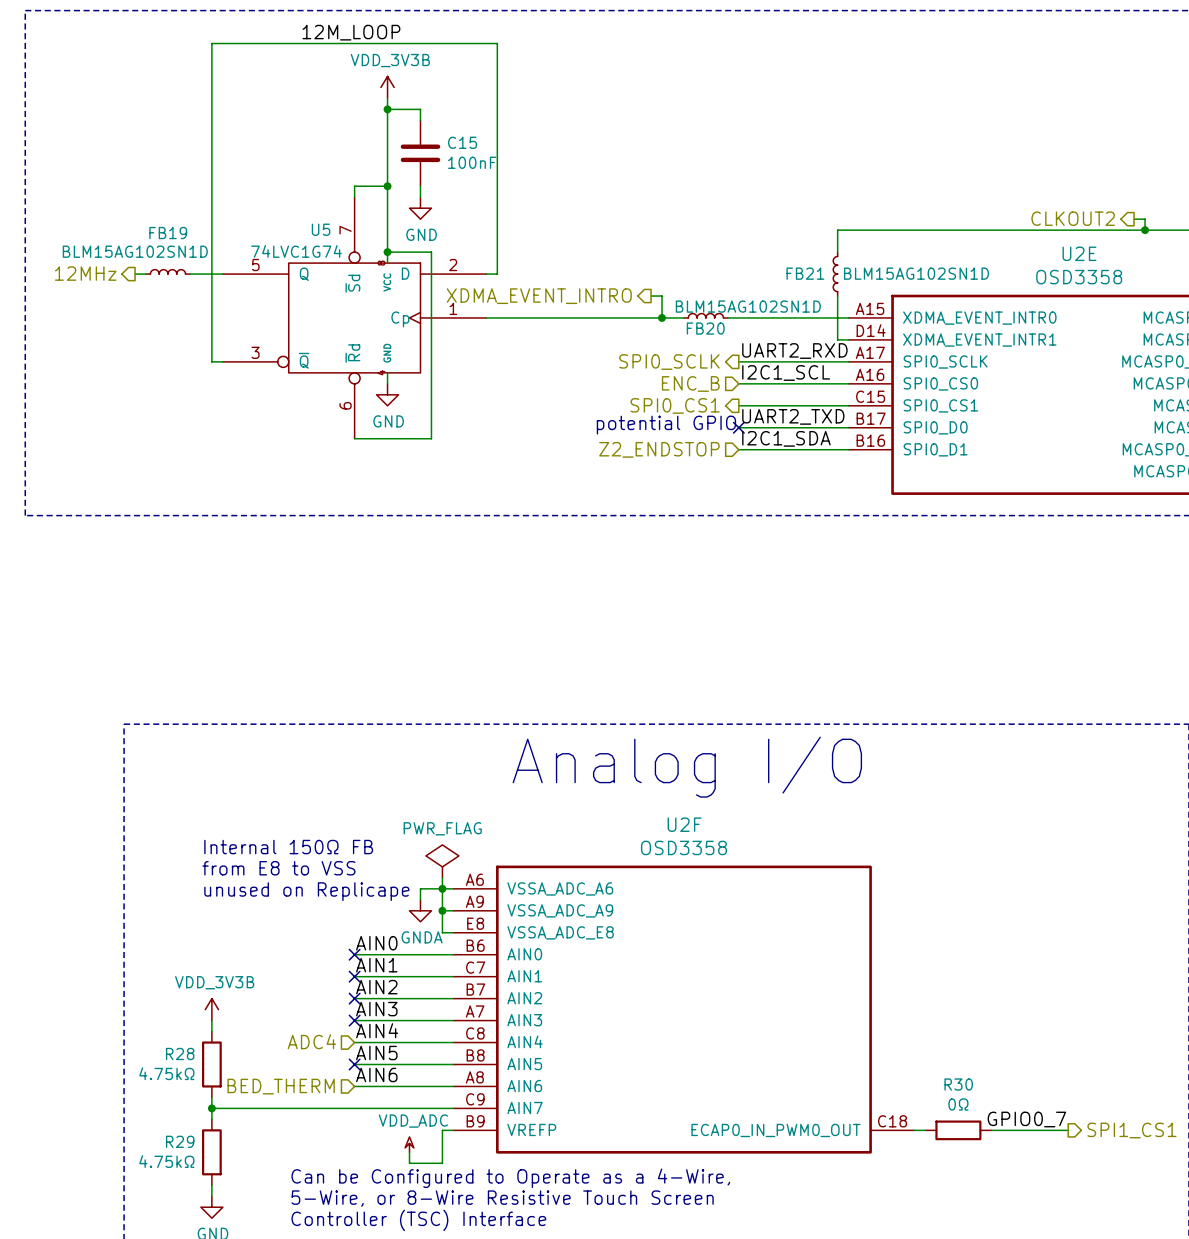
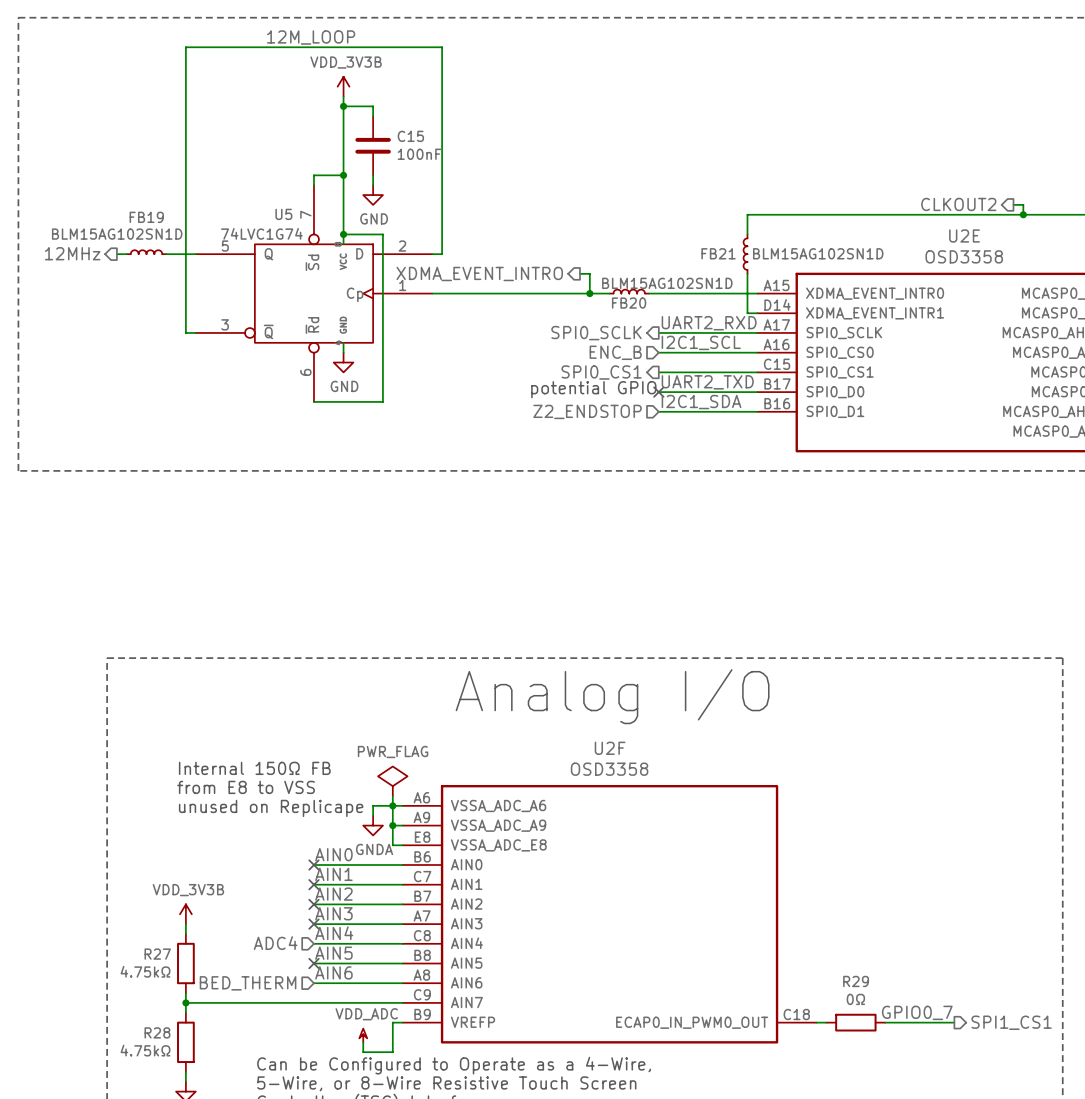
R28 name: R28 (180, 1053) -> R27 (157, 954)
R30 name: R30 (958, 1084) -> R29 (856, 981)
R29 name: R29 (180, 1141) -> R28 (157, 1032)

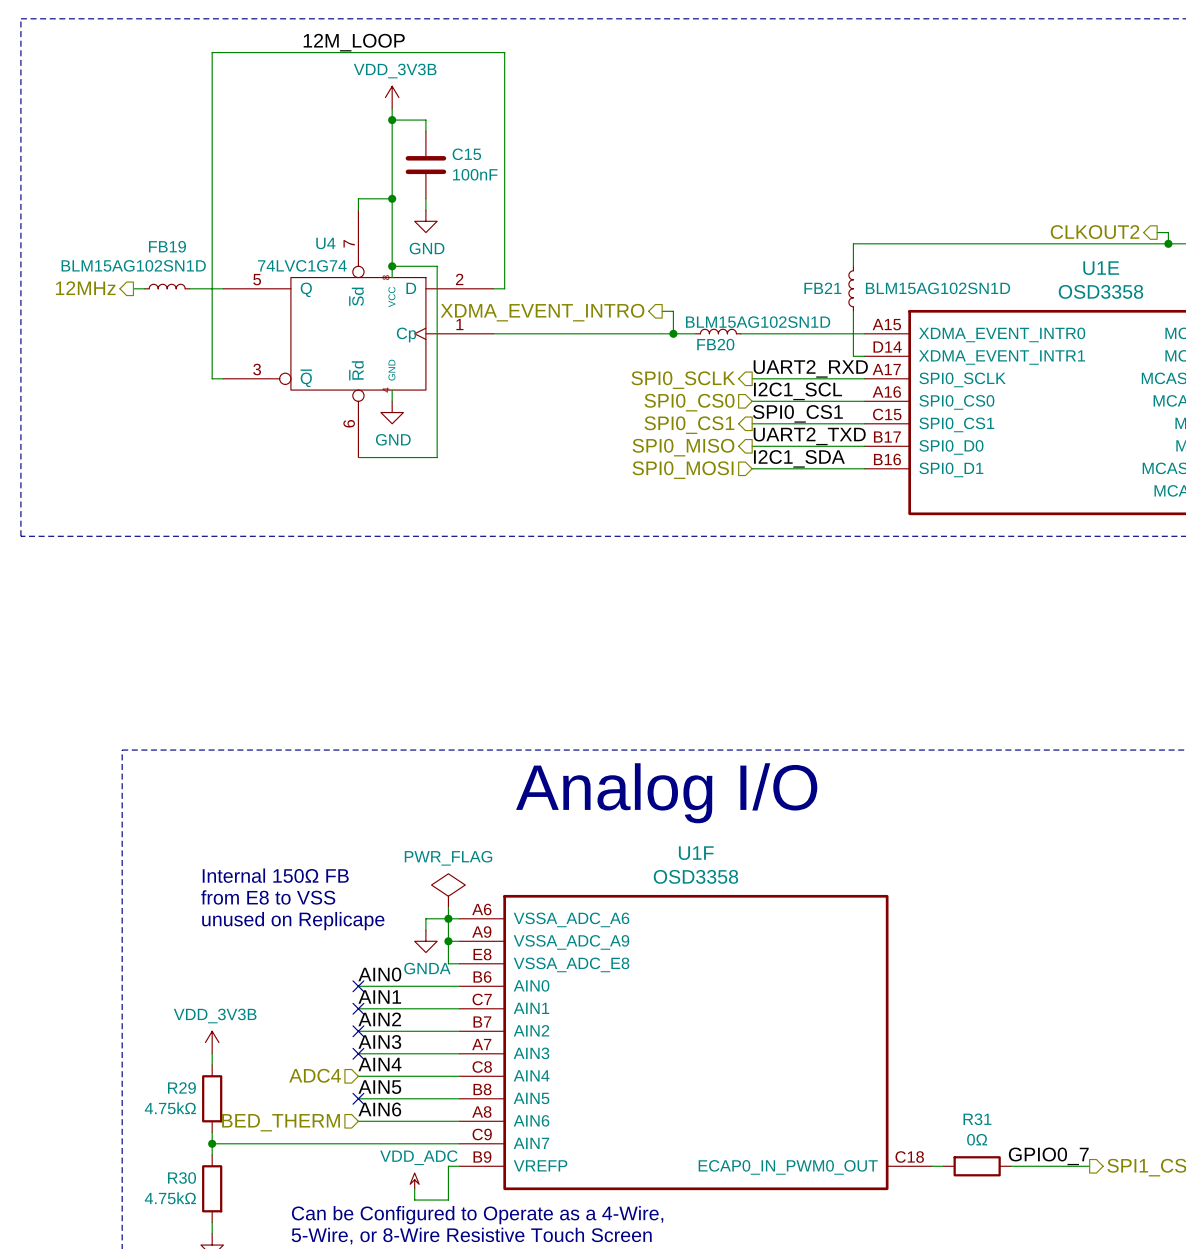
U5 name: U5 (283, 214) -> U4 (325, 243)
U2E name: U2E (964, 235) -> U1E (1101, 268)
hierarchical label: ENC_B (615, 352) -> SPI0_CS0 (689, 402)
label: none -> SPI0_CS1 (797, 413)
text: potential GPIO (593, 389) -> none
hierarchical label: none -> SPI0_MISO (683, 447)
no-connect mark: (658, 392) -> none
hierarchical label: Z2_ENDSTOP (587, 411) -> SPI0_MOSI (683, 470)
U2F name: U2F (610, 748) -> U1F (696, 853)
R27 name: R27 (157, 954) -> R29 (181, 1088)
R29 name: R29 (856, 981) -> R31 (977, 1119)
R28 name: R28 (157, 1032) -> R30 (182, 1178)

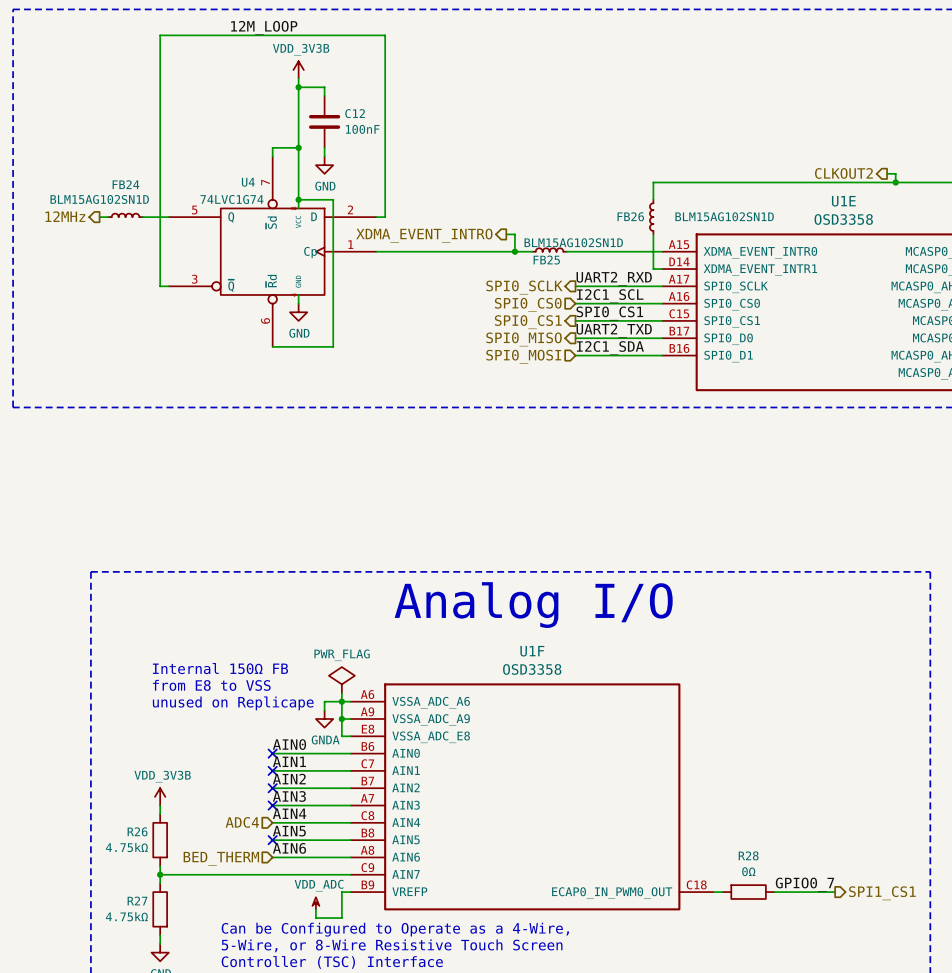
C15 name: C15 (466, 154) -> C12 (355, 113)
FB19 name: FB19 (167, 246) -> FB24 (125, 184)
FB21 name: FB21 (822, 288) -> FB26 (630, 216)
FB20 name: FB20 (715, 344) -> FB25 (546, 260)
R29 name: R29 (181, 1088) -> R26 (137, 831)
R31 name: R31 (977, 1119) -> R28 (748, 855)
R30 name: R30 (182, 1178) -> R27 (137, 901)

